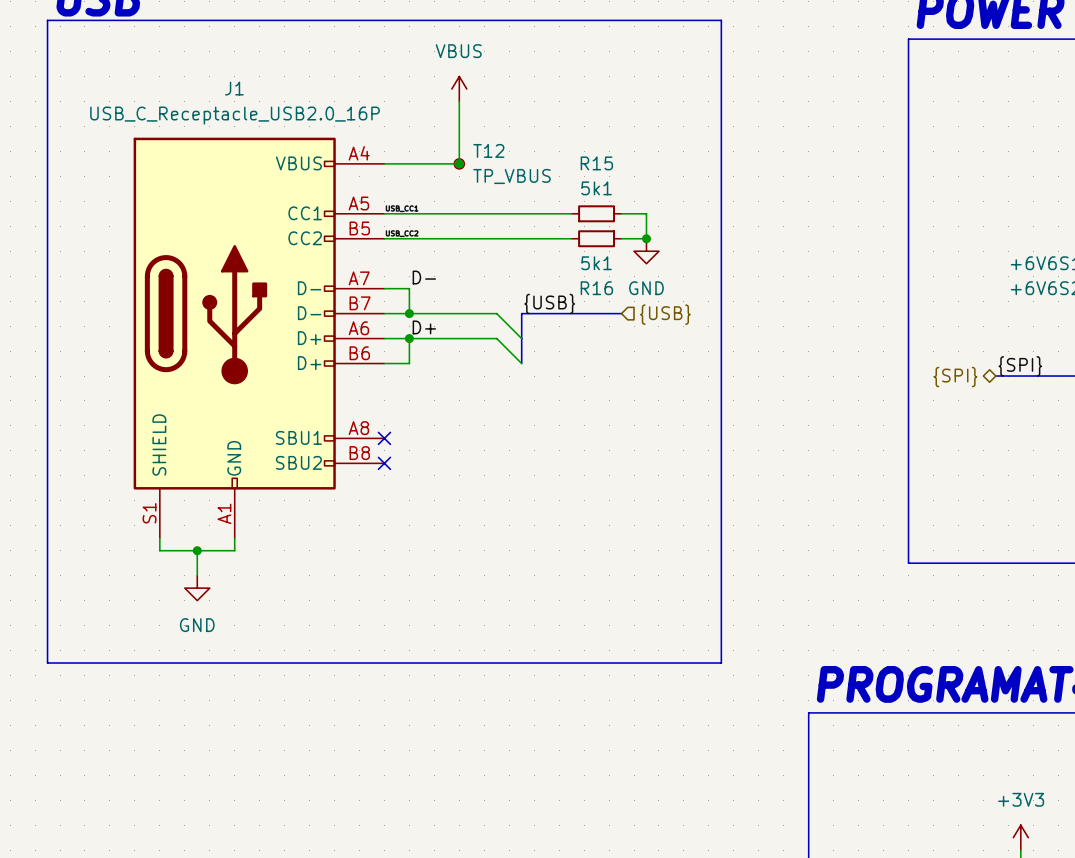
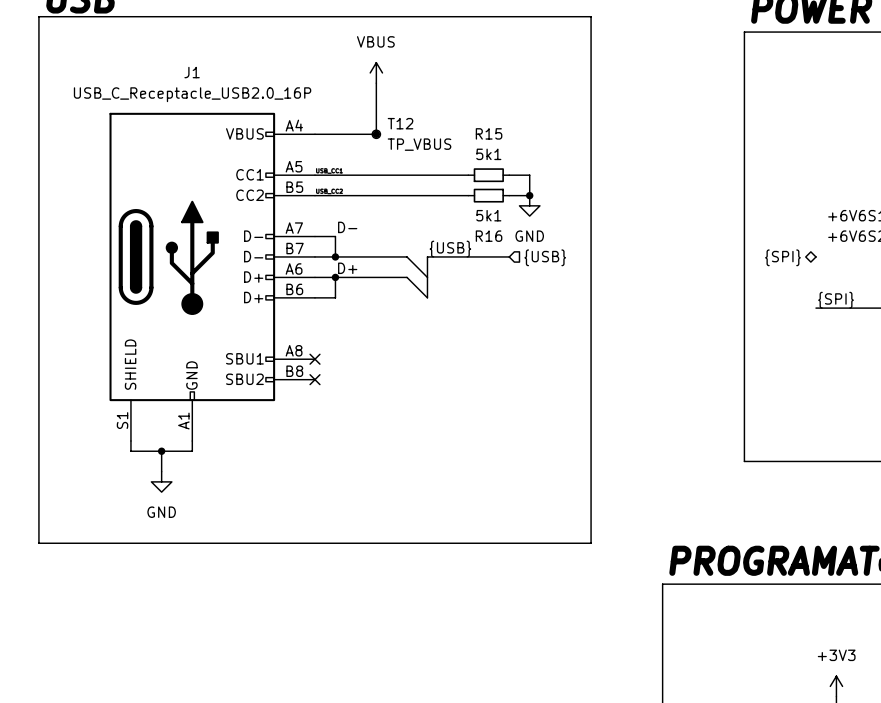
hierarchical label position: {SPI} (955, 377) -> {SPI} (782, 257)

